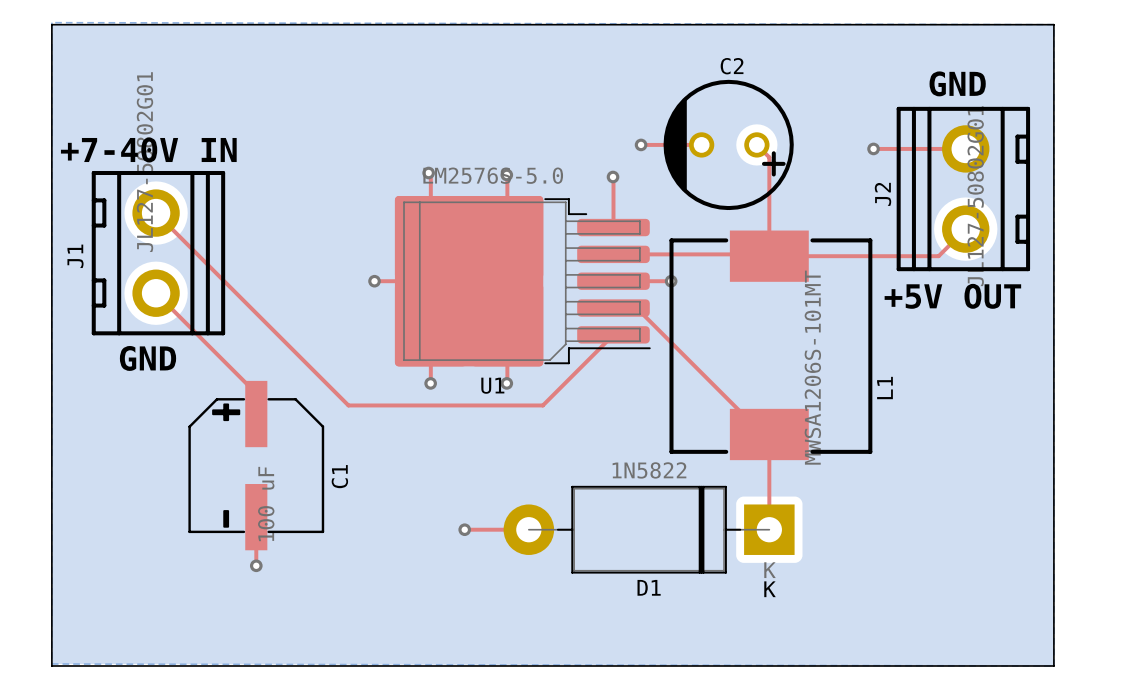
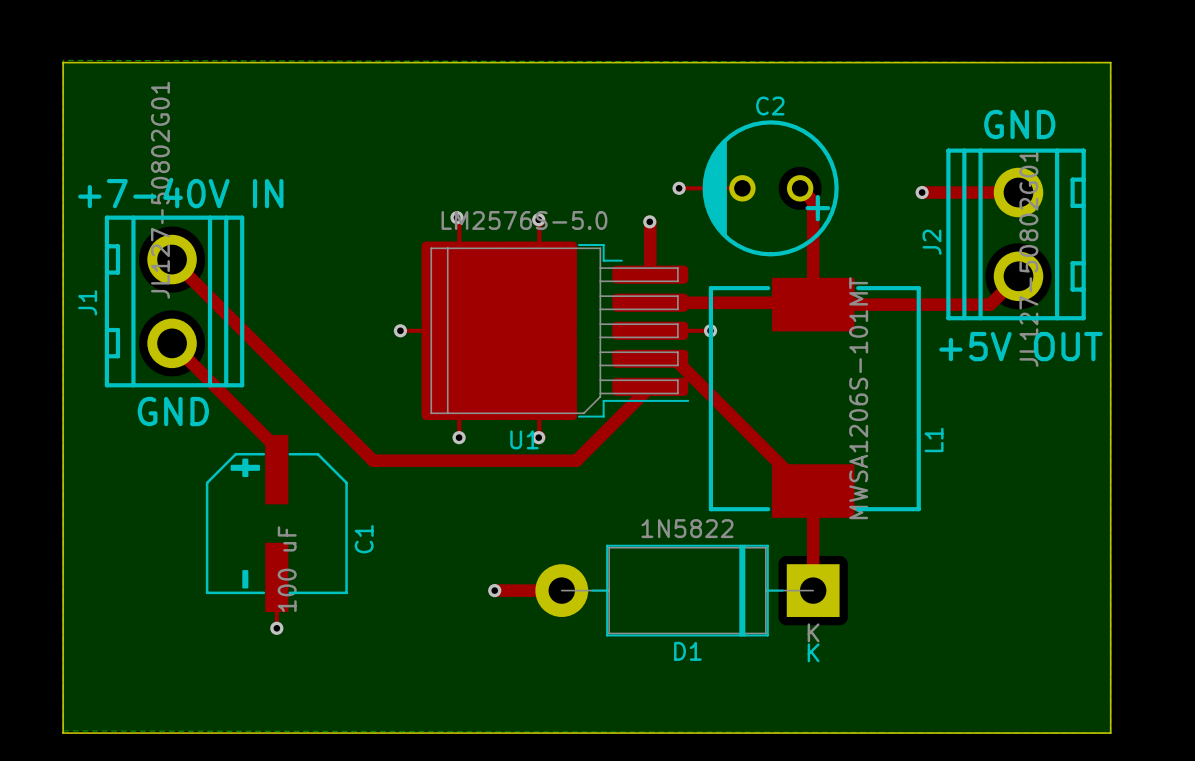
top track width: thin (756, 144) (769, 157) (769, 256) -> thick (800, 188) (813, 201) (813, 304)
top track width: thin (873, 148) (965, 148) -> thick (922, 192) (1018, 192)
top track width: thin (613, 177) (613, 227) -> thick (649, 221) (650, 274)
top track width: thin (156, 213) (348, 405) (542, 405) (613, 334) -> thick (172, 259) (373, 460) (576, 460) (650, 386)
top track width: thin (965, 229) (938, 256) (769, 256) -> thick (1018, 276) (990, 304) (813, 304)
top track width: thin (613, 254) (767, 254) (769, 256) -> thick (650, 302) (811, 302) (813, 304)
top track width: thin (156, 293) (256, 393) (256, 414) -> thick (172, 343) (276, 448) (276, 469)
top track width: thin (613, 308) (636, 308) (763, 434) (769, 434) (769, 529) -> thick (650, 358) (674, 358) (806, 491) (813, 491) (813, 590)
top track width: thin (464, 529) (528, 529) -> thick (494, 590) (561, 590)

